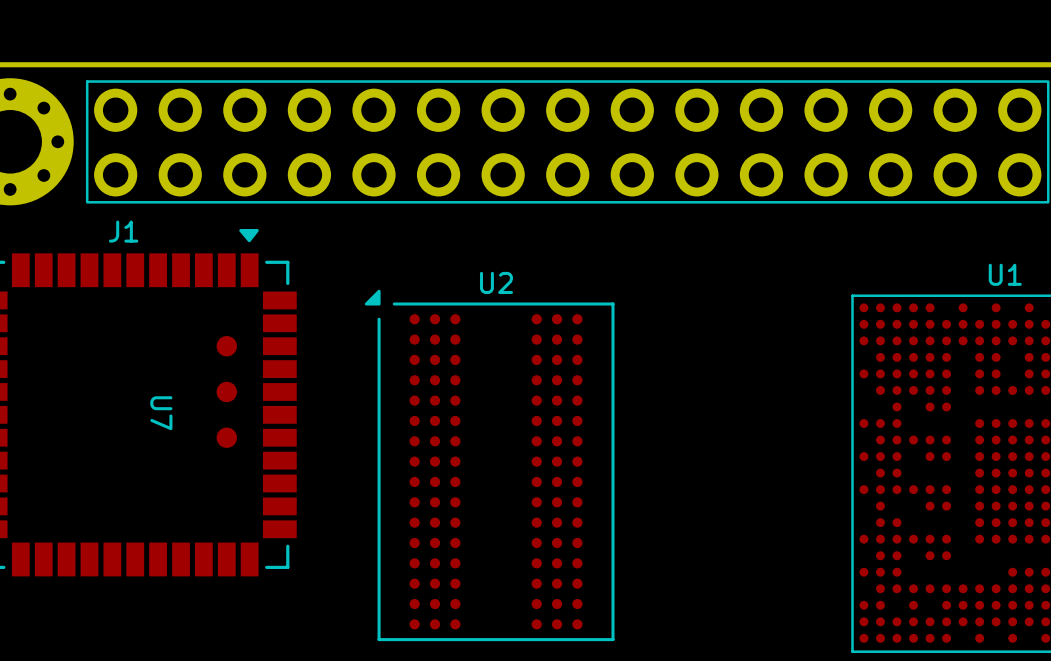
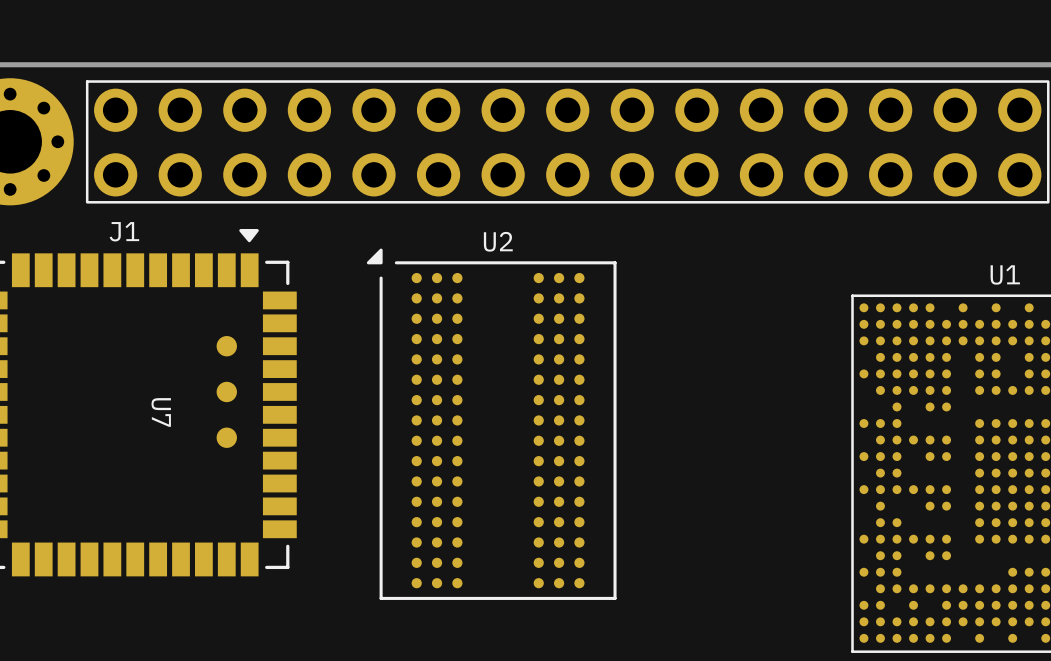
U2 position: (489, 465) -> (491, 424)

